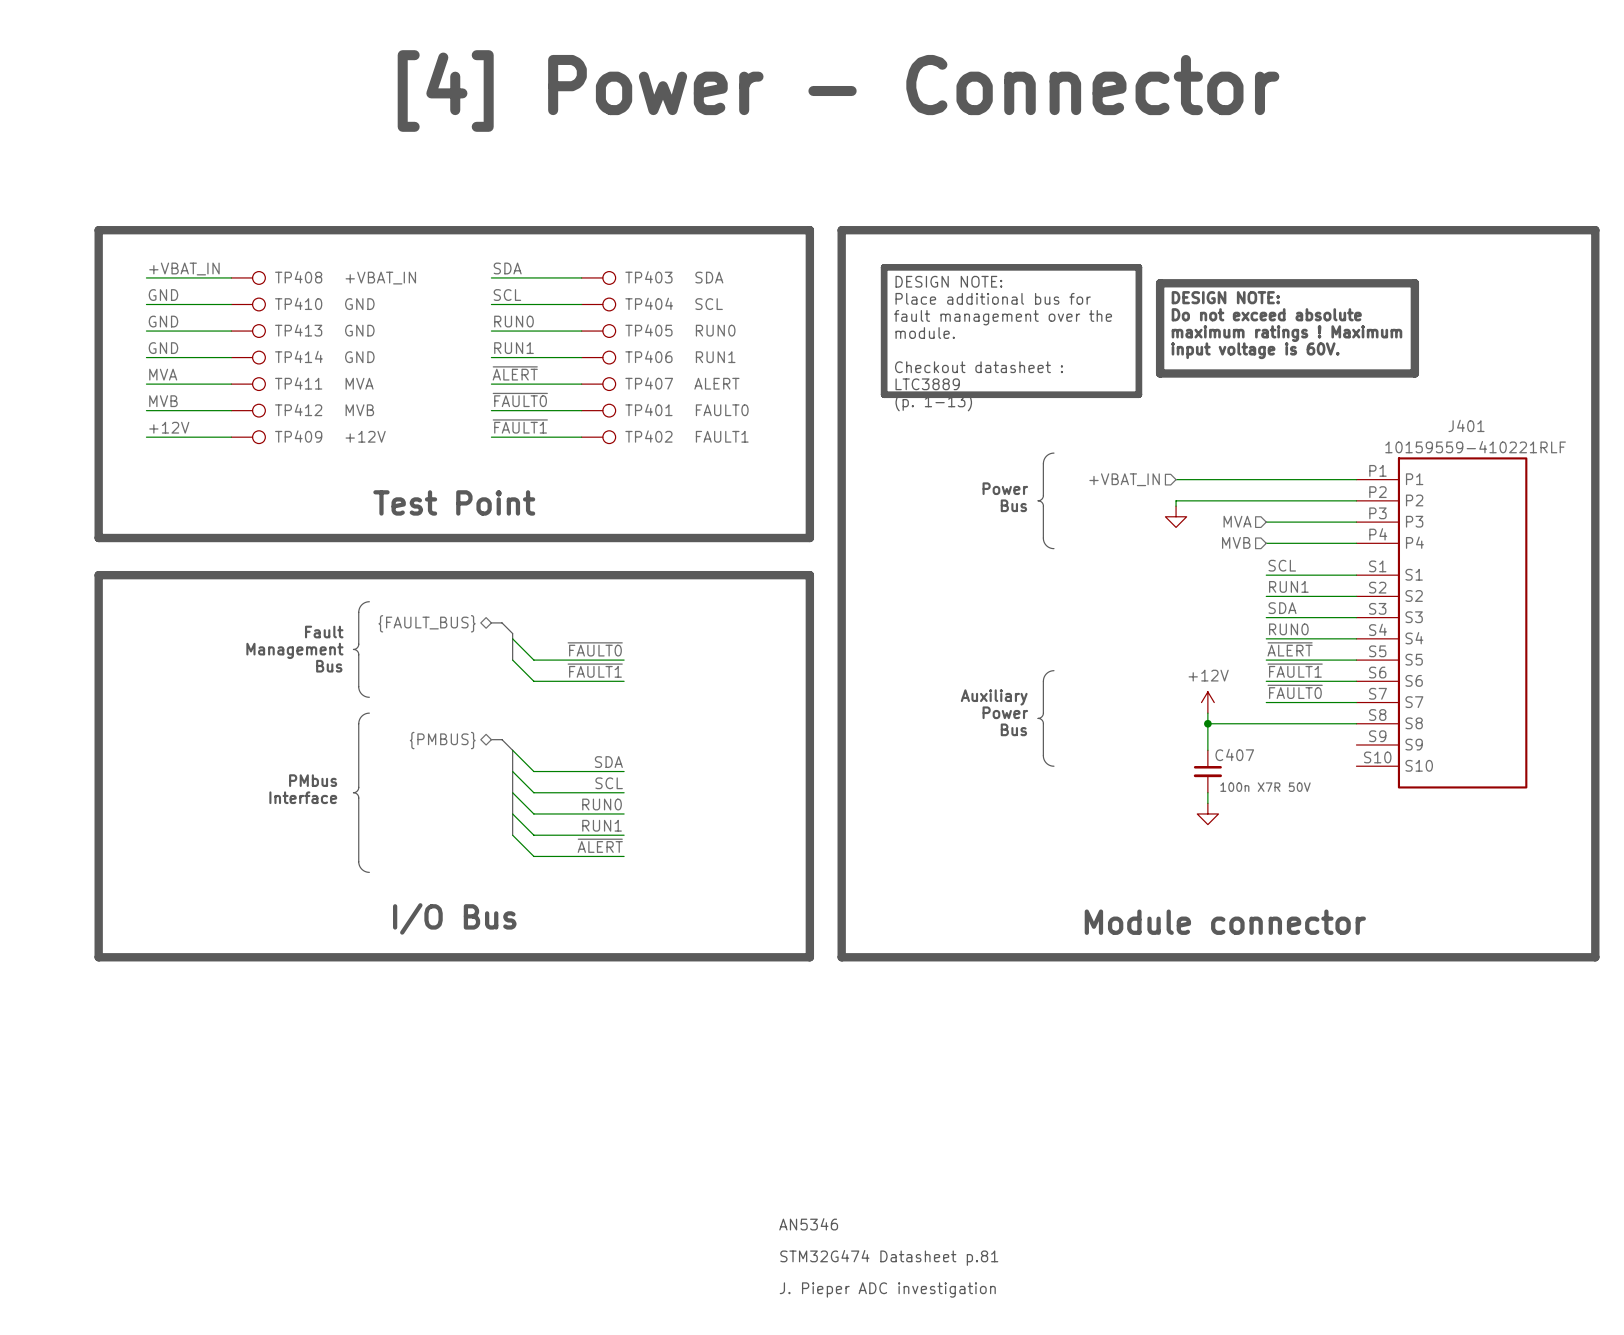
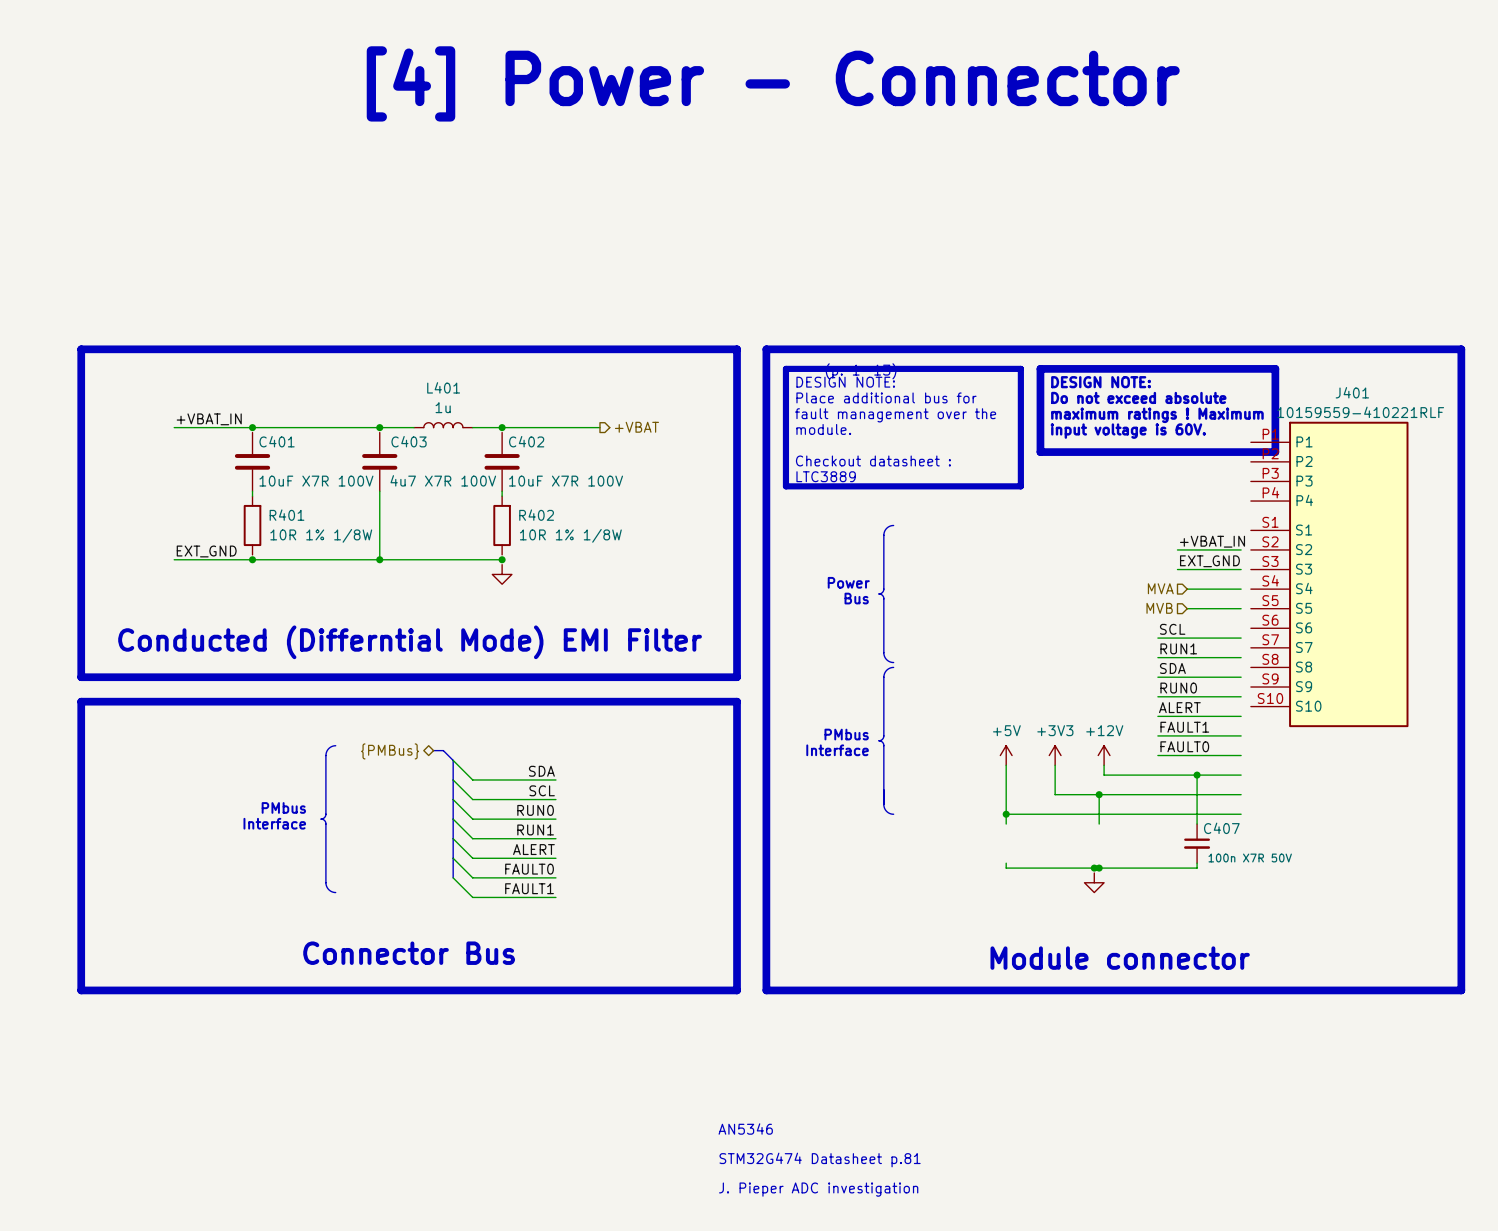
line: (98, 230) (809, 230) (809, 538) (98, 538) (98, 230) -> none
line: (841, 230) (1595, 230) (1595, 957) (841, 957) (841, 230) -> (766, 349) (766, 990) (1461, 990) (1461, 349) (766, 349)
line: (884, 267) (1138, 267) (1138, 394) (884, 394) (884, 267) -> (785, 368) (1020, 368) (1020, 486) (785, 486) (785, 368)
label position: +VBAT_IN (184, 268) -> +VBAT_IN (209, 419)
label: SDA (507, 268) -> none
wire: (146, 277) (231, 277) -> none
TP408: +VBAT_IN (248, 277) -> none
wire: (491, 277) (581, 277) -> none
TP403: SDA (598, 277) -> none
text position: DESIGN NOTE: (948, 281) -> DESIGN NOTE: (845, 382)
line: (1160, 283) (1414, 283) (1414, 373) (1160, 373) (1160, 283) -> (1040, 368) (1275, 368) (1275, 452) (1040, 452) (1040, 368)
label: GND (163, 295) -> none
label: SCL (507, 295) -> none
text position: DESIGN NOTE: (1225, 297) -> DESIGN NOTE: (1101, 382)
text position: Place additional bus for (993, 298) -> Place additional bus for (886, 397)
wire: (146, 304) (231, 304) -> none
TP410: GND (248, 304) -> none
wire: (491, 304) (581, 304) -> none
TP404: SCL (598, 304) -> none
text position: Do not exceed absolute (1266, 314) -> Do not exceed absolute (1138, 397)
text position: fault management over the (1003, 317) -> fault management over the (895, 415)
label: GND (163, 321) -> none
label: RUN0 (513, 321) -> none
wire: (146, 331) (231, 331) -> none
TP413: GND (248, 331) -> none
wire: (491, 331) (581, 331) -> none
TP405: RUN0 (598, 331) -> none
text position: module. (925, 333) -> module. (823, 429)
text position: maximum ratings ! Maximum (1286, 333) -> maximum ratings ! Maximum (1157, 415)
label: GND (163, 348) -> none
label: RUN1 (513, 348) -> none
text position: input voltage is 60V. (1255, 350) -> input voltage is 60V. (1128, 431)
wire: (146, 357) (231, 357) -> none
TP414: GND (248, 357) -> none
wire: (491, 357) (581, 357) -> none
TP406: RUN1 (598, 357) -> none
text position: Checkout datasheet : (979, 367) -> Checkout datasheet : (873, 460)
label: ~{ALERT} (515, 373) -> none
label: MVA (163, 374) -> none
line: none -> (81, 349) (737, 349) (737, 677) (81, 677) (81, 349)
wire: (146, 384) (231, 384) -> none
TP411: MVA (248, 384) -> none
wire: (491, 384) (581, 384) -> none
TP407: ALERT (598, 384) -> none
text position: LTC3889 (927, 384) -> LTC3889 (826, 476)
label: ~{FAULT0} (520, 399) -> none
label: MVB (163, 401) -> none
wire: (146, 410) (231, 410) -> none
TP412: MVB (248, 410) -> none
wire: (491, 410) (581, 410) -> none
TP401: FAULT0 (598, 410) -> none
label: ~{FAULT1} (520, 426) -> none
label: +12V (169, 427) -> none
wire: (146, 437) (231, 437) -> none
TP409: +12V (248, 437) -> none
wire: (491, 437) (581, 437) -> none
TP402: FAULT1 (598, 437) -> none
line: (1053, 453) (1046, 456) (1043, 463) -> (893, 525) (886, 528) (883, 535)
L401: none -> 1u (443, 425)
wire: none -> (174, 427) (414, 427)
junction: none -> (252, 427)
junction: none -> (379, 427)
wire: none -> (472, 427) (599, 427)
junction: none -> (502, 427)
hierarchical label: none -> +VBAT (636, 427)
line: (1043, 463) (1043, 495) -> none
hierarchical label: +VBAT_IN (1124, 479) -> none
wire: (1176, 479) (1356, 479) -> none
text: Power (1005, 488) -> none
line: (1043, 495) (1041, 499) (1038, 500) (1041, 502) (1043, 506) -> none
C401: none -> 10uF X7R 100V (252, 461)
C403: none -> 4u7 X7R 100V (379, 461)
C402: none -> 10uF X7R 100V (502, 461)
wire: (1356, 500) (1176, 500) (1176, 506) -> none
text: Test Point (454, 502) -> none
text: Bus (1013, 505) -> none
line: (1043, 506) (1043, 540) (1047, 546) (1053, 548) -> none
power symbol: (1176, 516) -> none
hierarchical label position: MVA (1237, 521) -> MVA (1160, 588)
wire: (1266, 522) (1356, 522) -> none
wire: none -> (379, 491) (379, 559)
hierarchical label position: MVB (1236, 542) -> MVB (1159, 608)
wire: (1266, 543) (1356, 543) -> (1157, 657) (1241, 657)
label position: SCL (1282, 565) -> SCL (1172, 629)
R401: none -> 10R 1% 1/8W (252, 525)
R402: none -> 10R 1% 1/8W (502, 525)
line: (98, 575) (98, 957) (809, 957) (809, 575) (98, 575) -> none
wire: (1266, 575) (1356, 575) -> (1157, 638) (1241, 638)
line: none -> (883, 535) (883, 589)
label position: RUN1 (1288, 586) -> RUN1 (1178, 648)
label: none -> +VBAT_IN (1212, 541)
wire: (1266, 596) (1276, 596) -> none
wire: (1345, 596) (1356, 596) -> none
label: none -> EXT_GND (206, 551)
line: (369, 601) (362, 604) (359, 609) (358, 644) (353, 649) (357, 650) (358, 654) -> none
wire: none -> (174, 559) (502, 559)
junction: none -> (252, 559)
junction: none -> (379, 559)
junction: none -> (502, 559)
label position: SDA (1282, 608) -> SDA (1172, 668)
label: none -> EXT_GND (1209, 561)
wire: (1266, 617) (1276, 617) -> none
wire: (1345, 617) (1356, 617) -> none
bus: (491, 622) (502, 622) (512, 633) (512, 660) -> none
power symbol: none -> (502, 574)
hierarchical label: {FAULT_BUS} (427, 623) -> none
label position: RUN0 (1288, 629) -> RUN0 (1178, 688)
text: none -> Power (848, 582)
text: Fault (324, 632) -> none
wire: (512, 638) (533, 660) (624, 660) -> none
wire: (1266, 638) (1287, 638) -> none
wire: (1345, 638) (1356, 638) -> none
label: ~{FAULT0} (595, 649) -> none
text: none -> Bus (856, 598)
line: none -> (883, 598) (883, 653) (887, 660) (893, 662)
label: ~{ALERT} (1290, 649) -> none
text: Management (294, 650) -> none
line: (358, 654) (358, 689) (362, 695) (369, 697) -> none
wire: (512, 660) (533, 681) (624, 681) -> none
wire: (1266, 660) (1287, 660) -> none
wire: (1345, 660) (1356, 660) -> none
text: Bus (329, 666) -> none
label: ~{FAULT1} (595, 670) -> none
line: (1053, 670) (1046, 673) (1043, 681) -> (893, 667) (886, 670) (883, 677)
label: ~{FAULT1} (1295, 670) -> none
line: (1043, 681) (1043, 713) -> none
wire: (1266, 681) (1356, 681) -> (1157, 735) (1241, 735)
label: ~{FAULT0} (1295, 691) -> none
text: none -> Conducted (Differntial Mode) EMI Filter (410, 642)
text: Auxiliary (994, 697) -> none
power symbol position: +12V (1207, 702) -> +12V (1104, 755)
wire: (1266, 702) (1356, 702) -> (1157, 755) (1241, 755)
text: Power (1005, 712) -> none
line: (369, 713) (362, 715) (358, 722) (358, 788) (353, 792) (357, 794) (358, 798) -> none
line: (1043, 713) (1041, 716) (1038, 718) (1041, 719) (1043, 723) -> (883, 589) (878, 593) (883, 598)
wire: (1207, 713) (1207, 750) -> none
line: (1043, 723) (1043, 757) (1047, 763) (1053, 766) -> none
wire: (1207, 723) (1356, 723) -> none
junction: (1207, 723) -> none
text: Bus (1013, 729) -> none
line: none -> (883, 677) (883, 735)
wire: none -> (1157, 677) (1241, 677)
bus: (491, 739) (502, 739) (512, 750) (512, 835) -> none
hierarchical label: {PMBUS} (442, 740) -> none
wire: (512, 750) (533, 771) -> (453, 760) (472, 779)
wire: none -> (1157, 696) (1241, 696)
line: none -> (81, 701) (81, 990) (737, 990) (737, 701) (81, 701)
label position: SDA (608, 762) -> SDA (541, 771)
label: none -> ALERT (1179, 707)
wire: (512, 771) (533, 792) (624, 792) -> (453, 779) (472, 799) (555, 799)
wire: (533, 771) (624, 771) -> (472, 779) (555, 779)
C407 position: (1207, 771) -> (1197, 843)
wire: none -> (1157, 716) (1241, 716)
text position: PMbus (313, 780) -> PMbus (283, 807)
label position: SCL (609, 783) -> SCL (542, 790)
label: none -> FAULT1 (1184, 727)
wire: (512, 792) (533, 813) -> (453, 799) (472, 819)
wire: (1207, 792) (1207, 803) -> none
text: none -> PMbus (846, 734)
text position: Interface (303, 797) -> Interface (274, 823)
line: (358, 798) (358, 863) (361, 869) (369, 872) -> none
line: none -> (883, 735) (878, 740) (883, 745)
label position: RUN0 (602, 804) -> RUN0 (535, 810)
line: none -> (335, 745) (328, 748) (326, 754) (325, 814)
line: none -> (883, 745) (883, 805) (886, 811) (893, 814)
label: none -> FAULT0 (1184, 746)
bus: none -> (433, 750) (443, 750) (453, 760) (453, 877)
wire: (512, 813) (533, 835) (624, 835) -> (453, 819) (472, 838) (555, 838)
wire: (533, 813) (624, 813) -> (472, 819) (555, 819)
text: none -> Interface (837, 750)
power symbol position: (1207, 813) -> (1094, 882)
hierarchical label: none -> {PMBus} (390, 751)
power symbol: none -> +5V (1006, 755)
power symbol: none -> +3V3 (1055, 755)
label position: RUN1 (602, 825) -> RUN1 (535, 829)
wire: none -> (1006, 765) (1006, 824)
wire: none -> (1055, 765) (1055, 794) (1241, 794)
wire: none -> (1104, 765) (1104, 775) (1241, 775)
wire: (512, 835) (533, 856) -> (453, 838) (472, 858)
wire: none -> (1197, 775) (1197, 824)
junction: none -> (1197, 775)
label: ~{ALERT} (600, 845) -> none
wire: (533, 856) (624, 856) -> (472, 858) (555, 858)
wire: none -> (1099, 794) (1099, 824)
junction: none -> (1099, 794)
line: none -> (325, 814) (321, 819) (325, 823) (326, 884) (329, 890) (335, 892)
wire: none -> (1006, 814) (1241, 814)
junction: none -> (1006, 814)
text: I/O Bus (454, 918) -> none
label: none -> ALERT (533, 849)
text position: Module connector (1225, 922) -> Module connector (1120, 958)
wire: none -> (453, 858) (472, 877) (555, 877)
wire: none -> (1006, 863) (1006, 868) (1197, 868) (1197, 863)
junction: none -> (1094, 868)
junction: none -> (1099, 868)
label: none -> FAULT0 (529, 869)
wire: none -> (453, 877) (472, 897) (555, 897)
label: none -> FAULT1 (529, 888)
text: none -> Connector Bus (409, 953)

